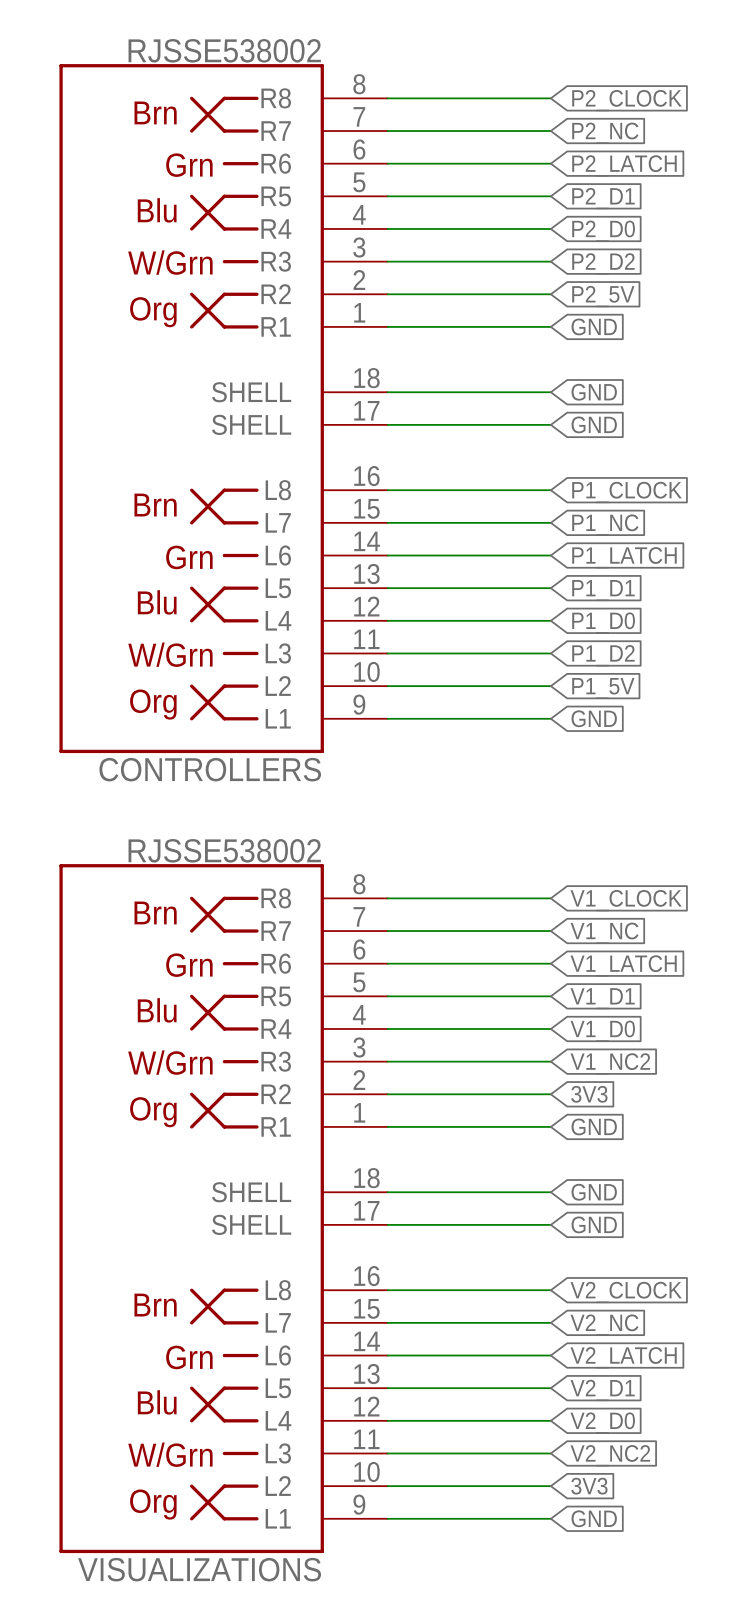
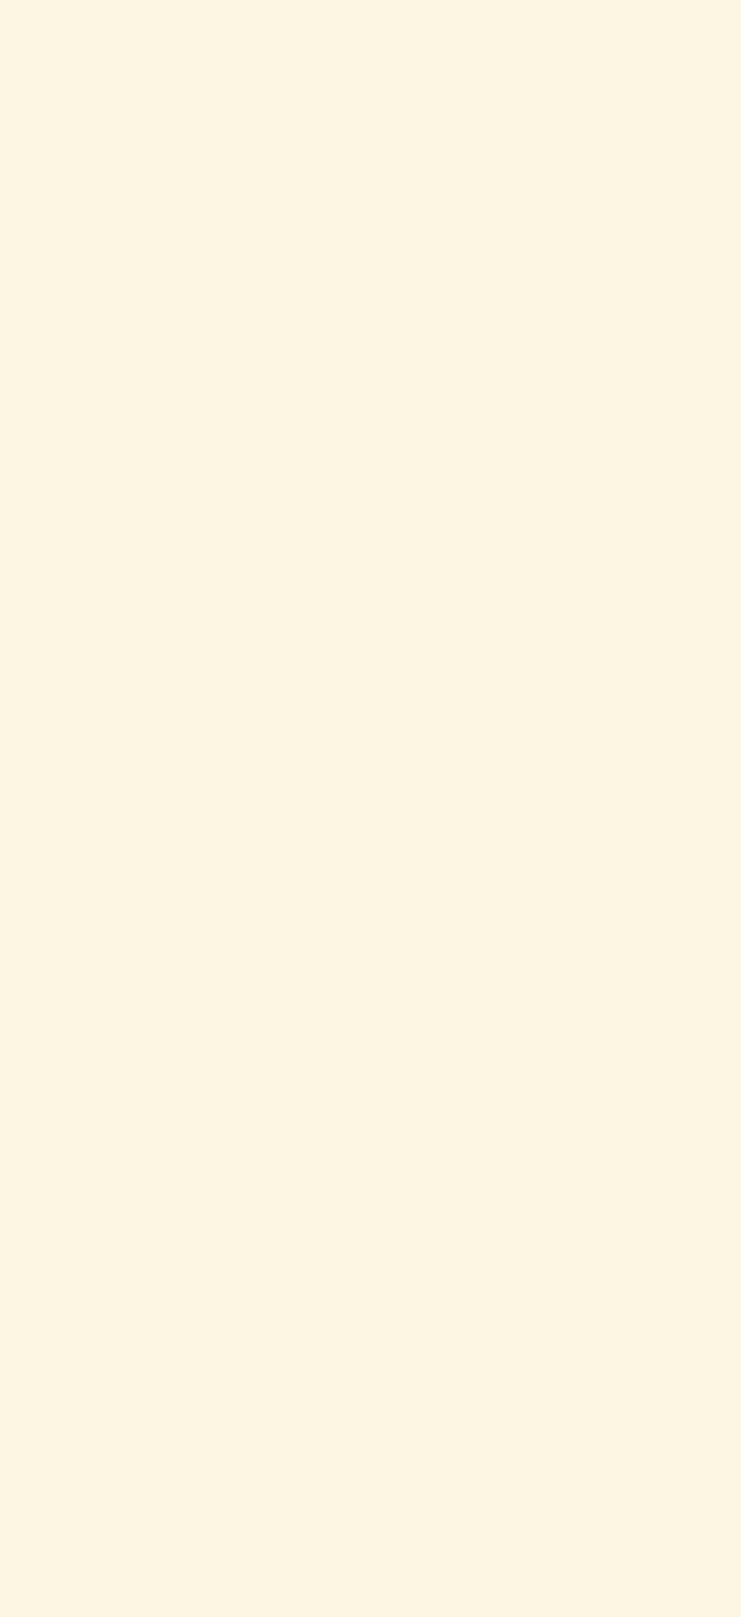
wire: (387, 98) (550, 98) -> none
global label: P2_CLOCK (627, 100) -> none
wire: (387, 131) (550, 131) -> none
global label: P2_NC (605, 133) -> none
wire: (387, 163) (550, 163) -> none
global label: P2_LATCH (624, 165) -> none
wire: (387, 196) (550, 196) -> none
global label: P2_D1 (603, 198) -> none
wire: (387, 228) (550, 228) -> none
global label: P2_D0 (603, 231) -> none
wire: (387, 261) (550, 261) -> none
global label: P2_D2 (603, 263) -> none
wire: (387, 294) (550, 294) -> none
global label: P2_5V (603, 296) -> none
wire: (387, 326) (550, 326) -> none
global label: GND (594, 326) -> none
wire: (387, 392) (550, 392) -> none
global label: GND (594, 392) -> none
CONTROLLERS: RJSSE538002 (223, 408) -> none
wire: (387, 424) (550, 424) -> none
global label: GND (594, 424) -> none
wire: (387, 490) (550, 490) -> none
global label: P1_CLOCK (627, 492) -> none
wire: (387, 522) (550, 522) -> none
global label: P1_NC (605, 525) -> none
wire: (387, 555) (550, 555) -> none
global label: P1_LATCH (624, 557) -> none
wire: (387, 588) (550, 588) -> none
global label: P1_D1 (603, 590) -> none
wire: (387, 620) (550, 620) -> none
global label: P1_D0 (603, 623) -> none
wire: (387, 653) (550, 653) -> none
global label: P1_D2 (603, 655) -> none
wire: (387, 686) (550, 686) -> none
global label: P1_5V (603, 688) -> none
wire: (387, 718) (550, 718) -> none
global label: GND (594, 718) -> none
wire: (387, 898) (550, 898) -> none
global label: V1_CLOCK (626, 900) -> none
wire: (387, 931) (550, 931) -> none
global label: V1_NC (604, 933) -> none
wire: (387, 963) (550, 963) -> none
global label: V1_LATCH (623, 965) -> none
wire: (387, 996) (550, 996) -> none
global label: V1_D1 (602, 998) -> none
wire: (387, 1028) (550, 1028) -> none
global label: V1_D0 (602, 1031) -> none
wire: (387, 1061) (550, 1061) -> none
global label: V1_NC2 (610, 1063) -> none
wire: (387, 1094) (550, 1094) -> none
global label: 3V3 (589, 1094) -> none
wire: (387, 1126) (550, 1126) -> none
global label: GND (594, 1126) -> none
wire: (387, 1192) (550, 1192) -> none
global label: GND (594, 1192) -> none
VISUALIZATIONS: RJSSE538002 (223, 1208) -> none
wire: (387, 1224) (550, 1224) -> none
global label: GND (594, 1224) -> none
wire: (387, 1290) (550, 1290) -> none
global label: V2_CLOCK (626, 1292) -> none
wire: (387, 1322) (550, 1322) -> none
global label: V2_NC (604, 1325) -> none
wire: (387, 1355) (550, 1355) -> none
global label: V2_LATCH (623, 1357) -> none
wire: (387, 1388) (550, 1388) -> none
global label: V2_D1 (602, 1390) -> none
wire: (387, 1420) (550, 1420) -> none
global label: V2_D0 (602, 1423) -> none
wire: (387, 1453) (550, 1453) -> none
global label: V2_NC2 (610, 1455) -> none
wire: (387, 1486) (550, 1486) -> none
global label: 3V3 (589, 1486) -> none
wire: (387, 1518) (550, 1518) -> none
global label: GND (594, 1518) -> none

